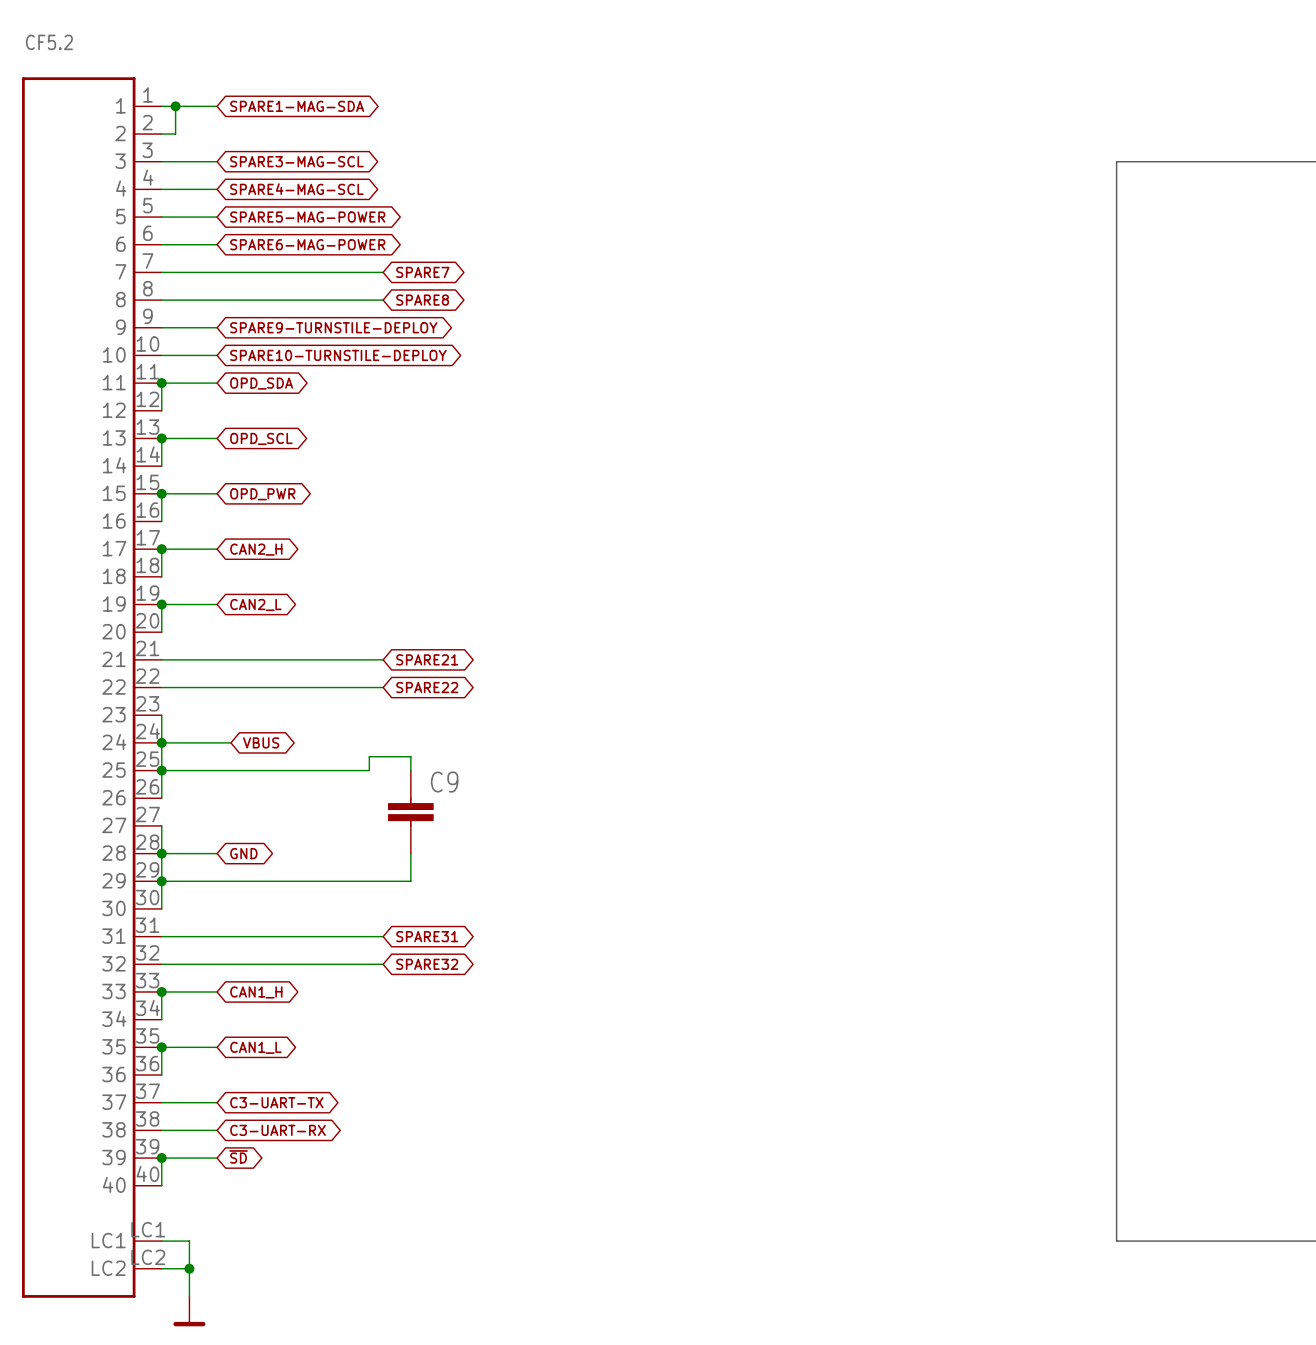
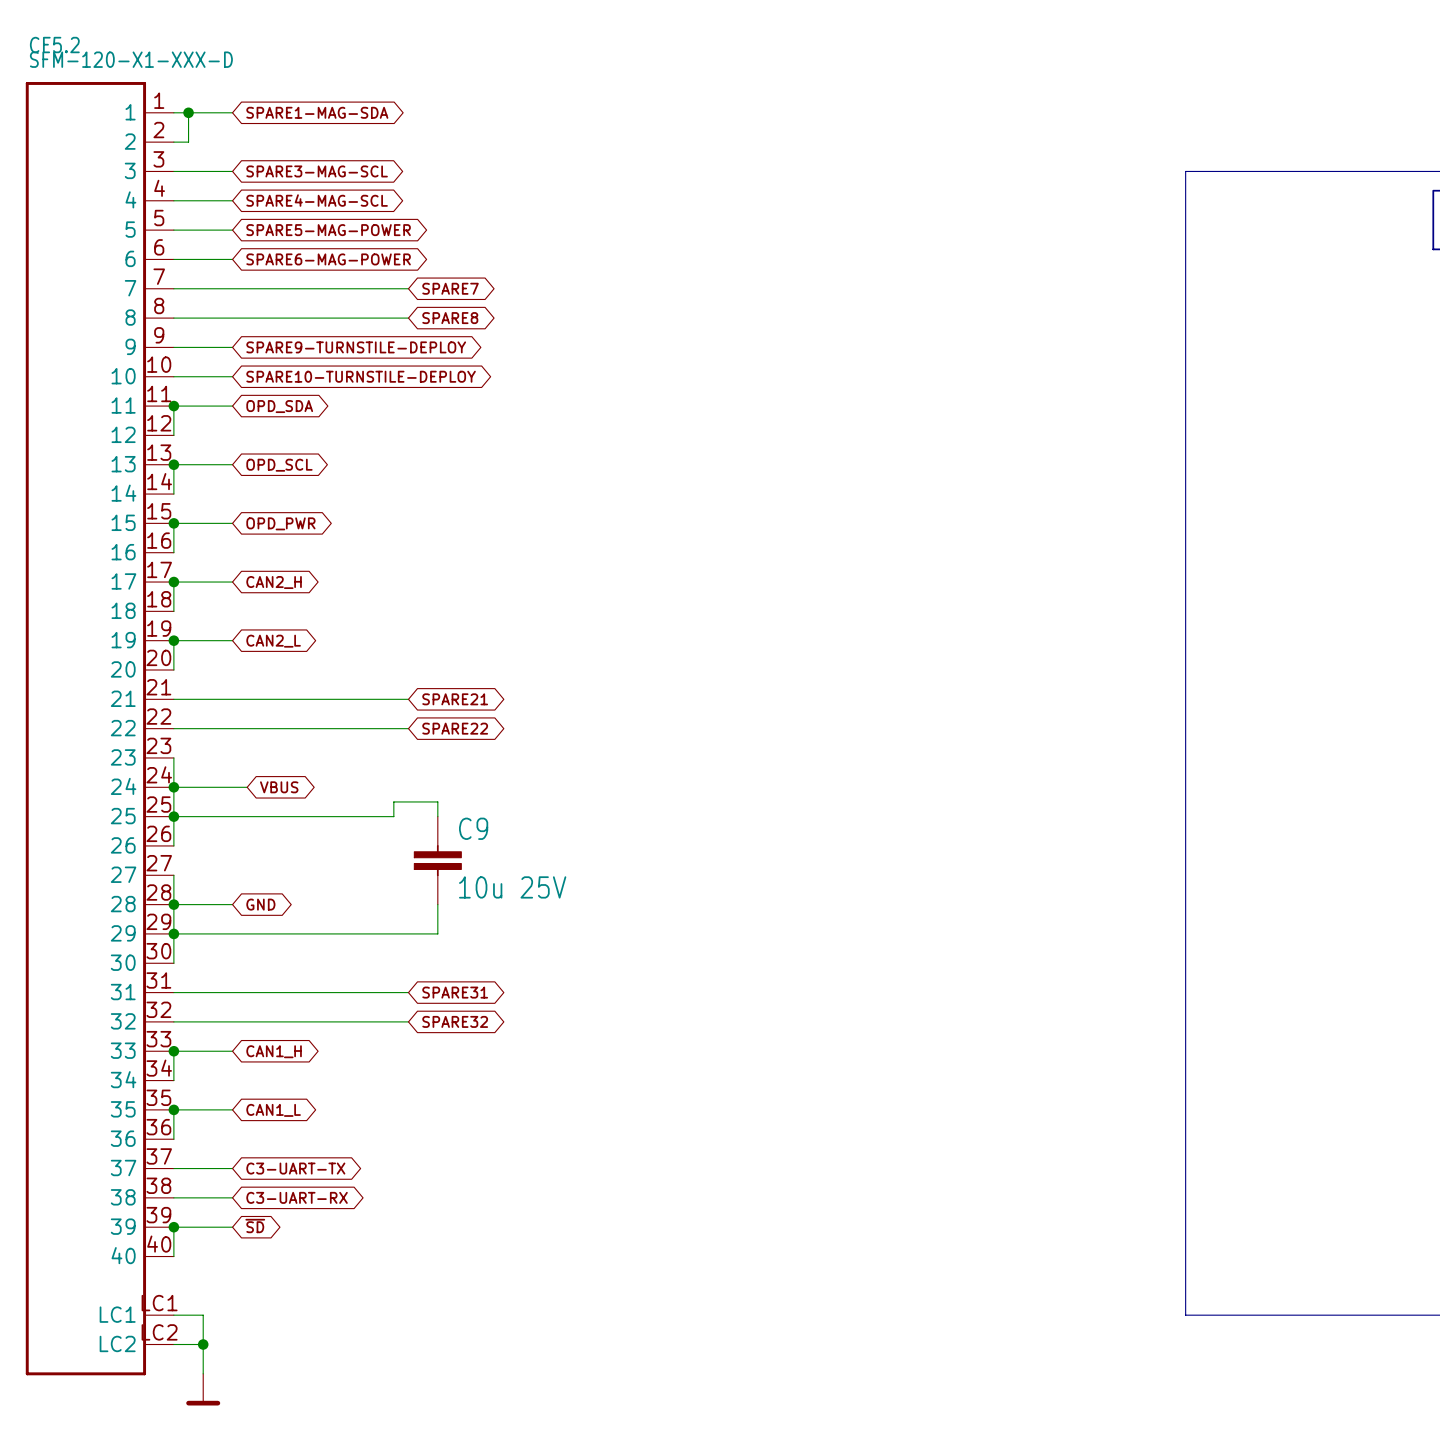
CF5.2 value: none -> SFM-120-X1-XXX-D (131, 59)
C9 value: none -> 10u 25V (512, 887)

